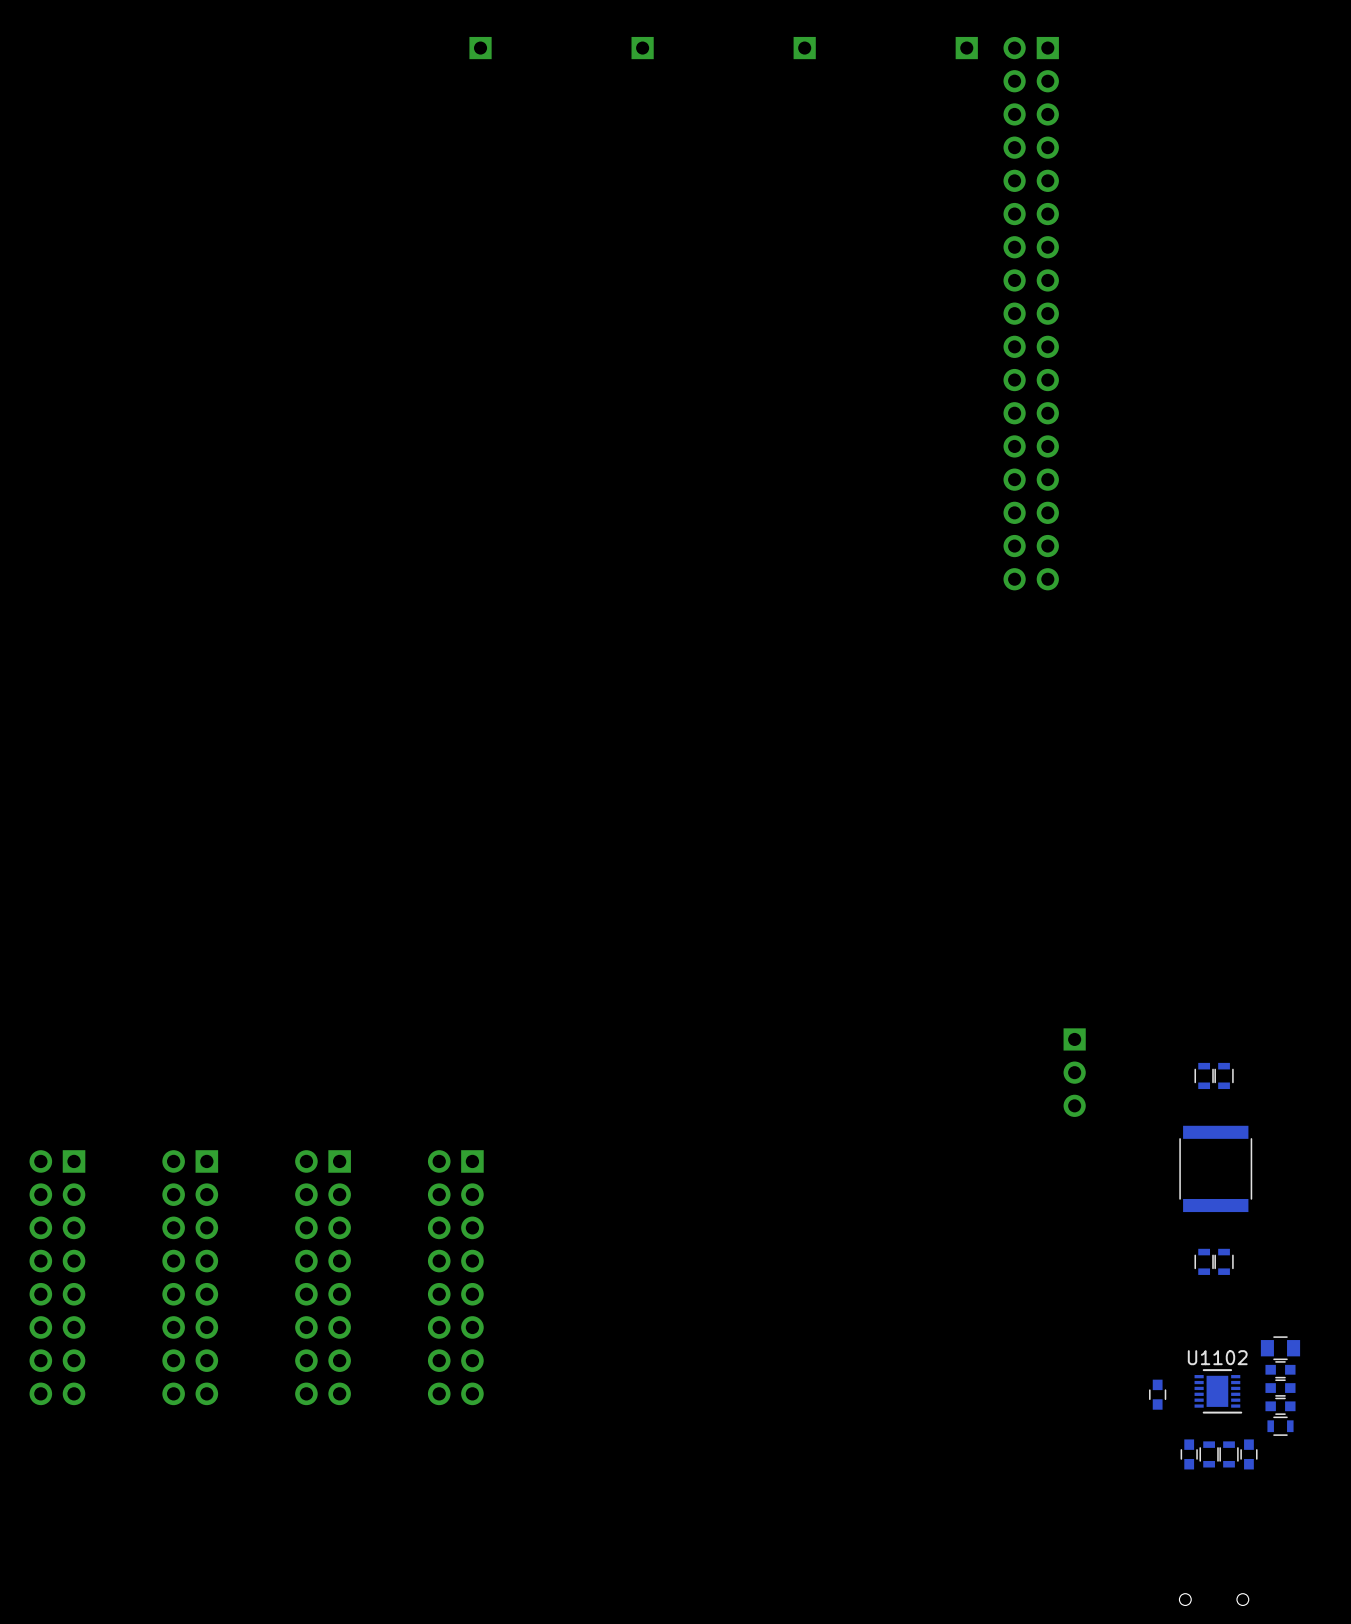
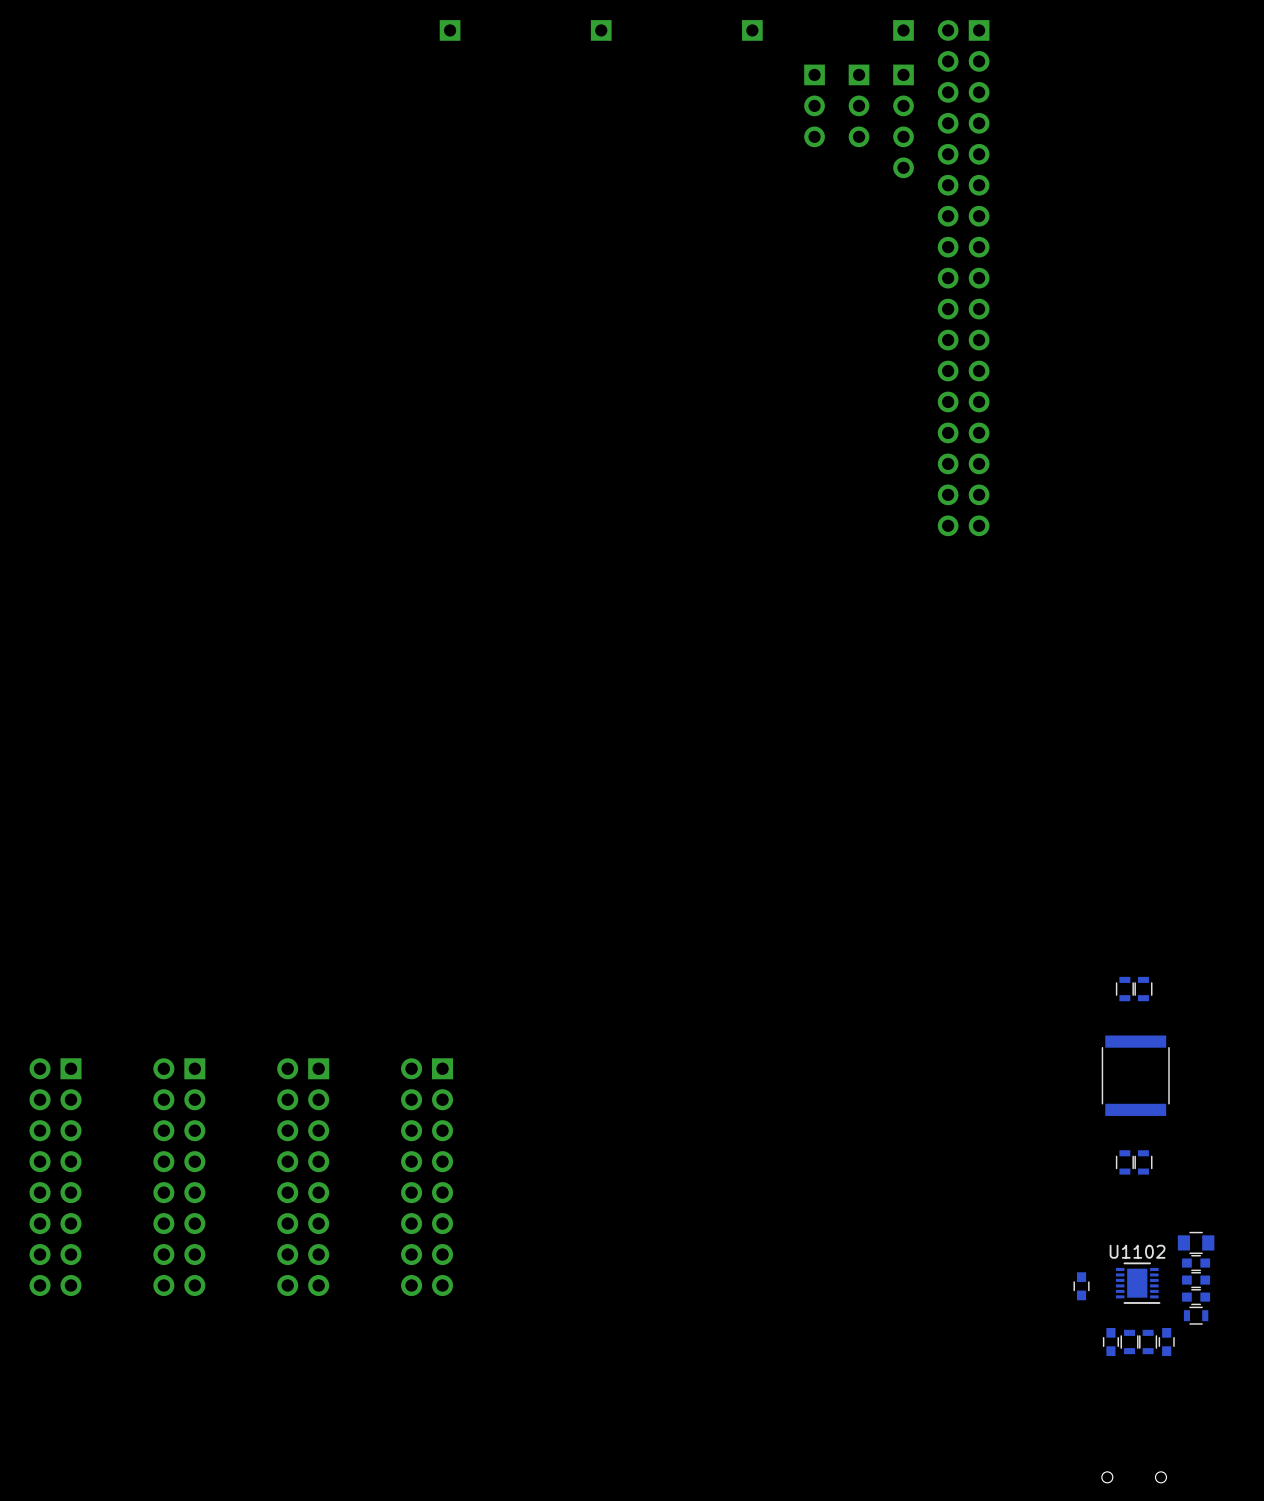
part: none -> (814, 105)
part: none -> (859, 105)
part: none -> (903, 121)
part: (1074, 1072) -> none

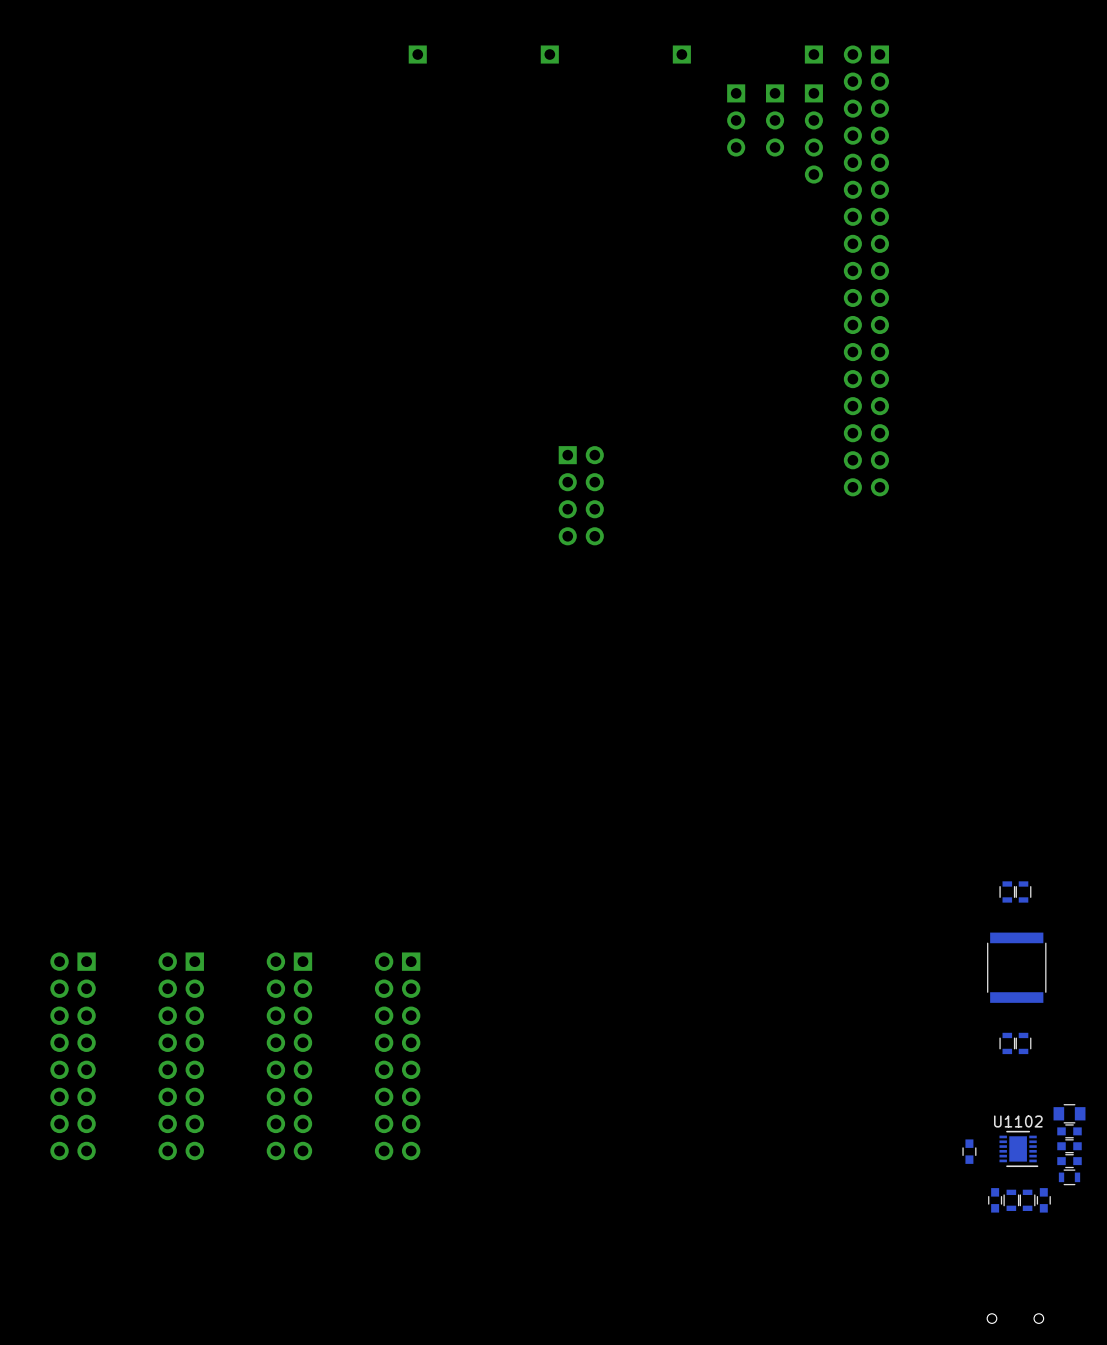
part: none -> (581, 495)

